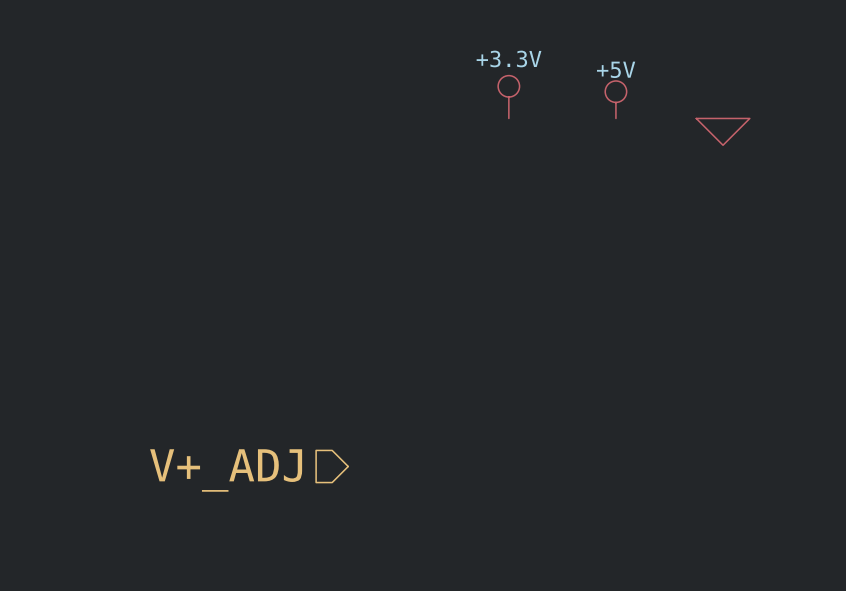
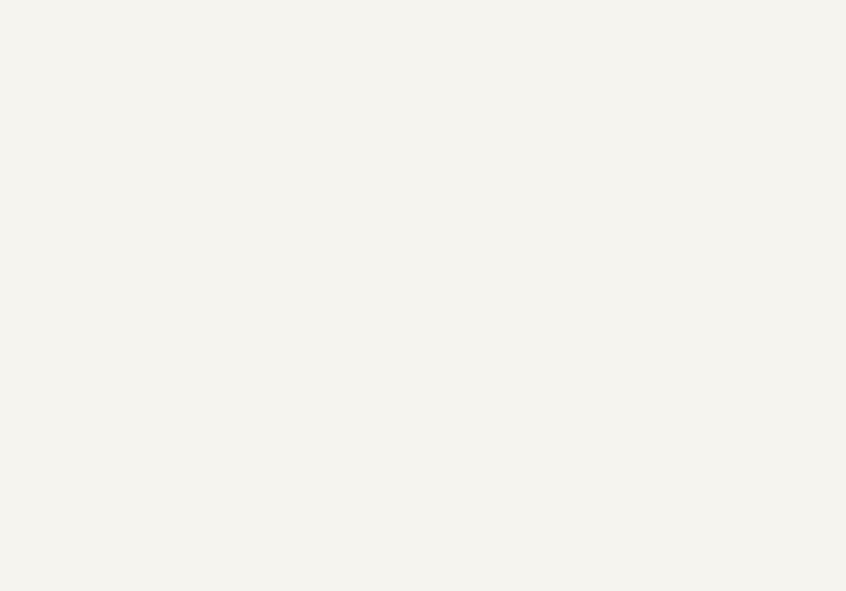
power symbol: +3.3V (508, 97) -> none
power symbol: +5V (615, 99) -> none
power symbol: (723, 131) -> none
hierarchical label: V+_ADJ (226, 470) -> none

